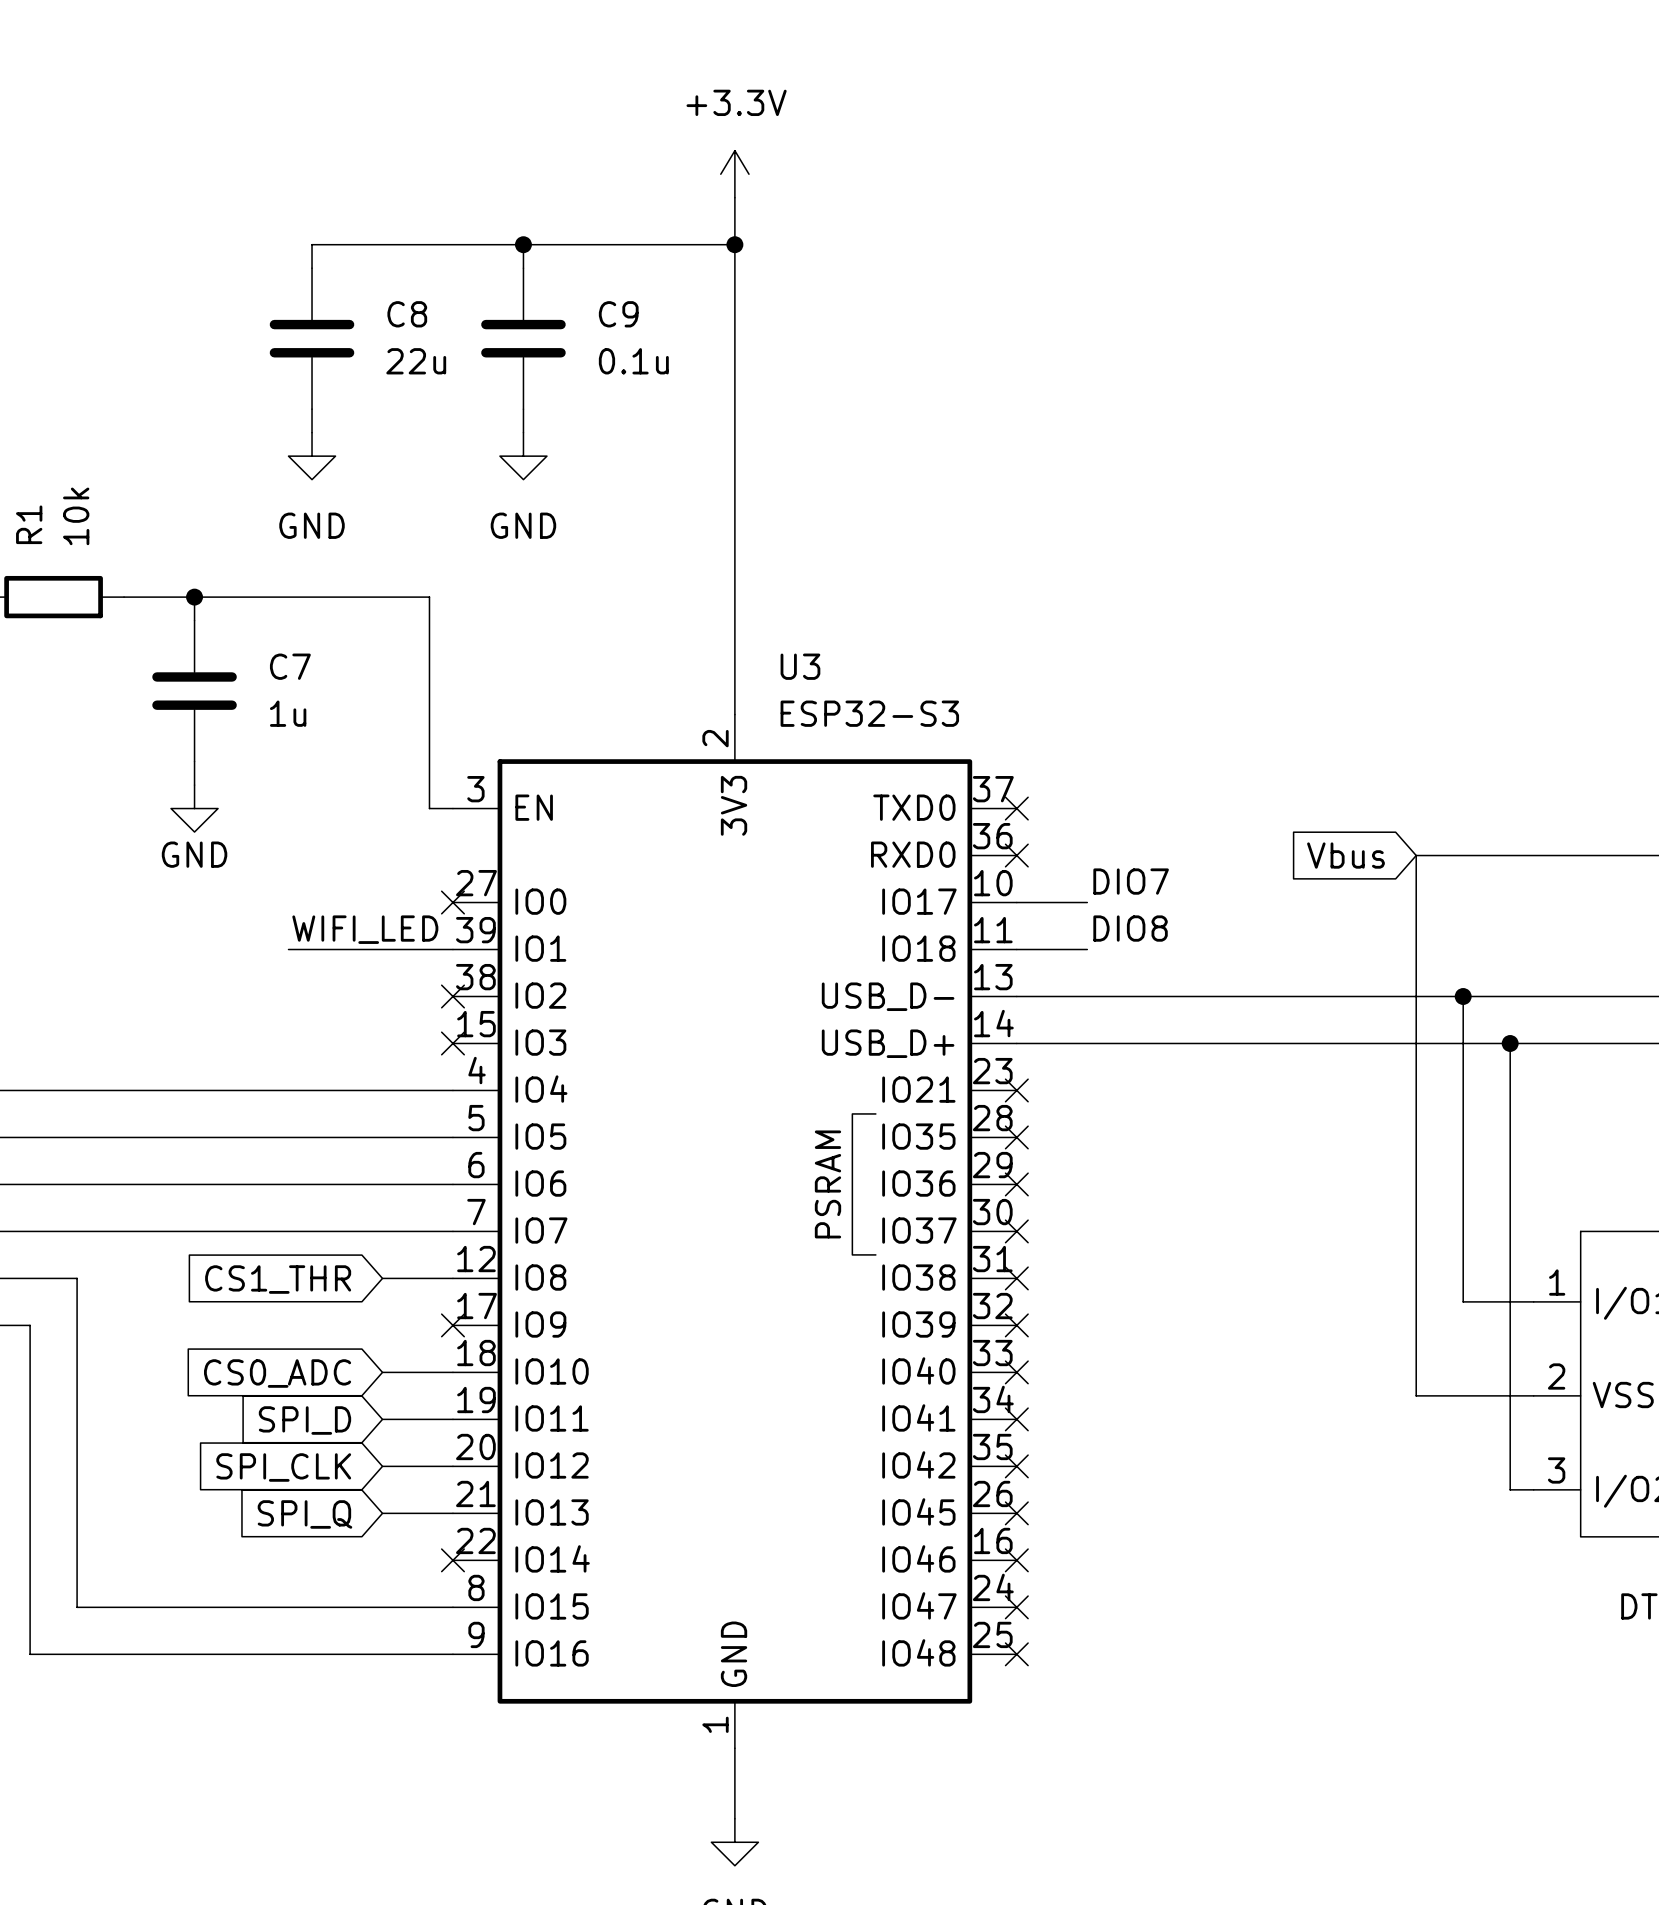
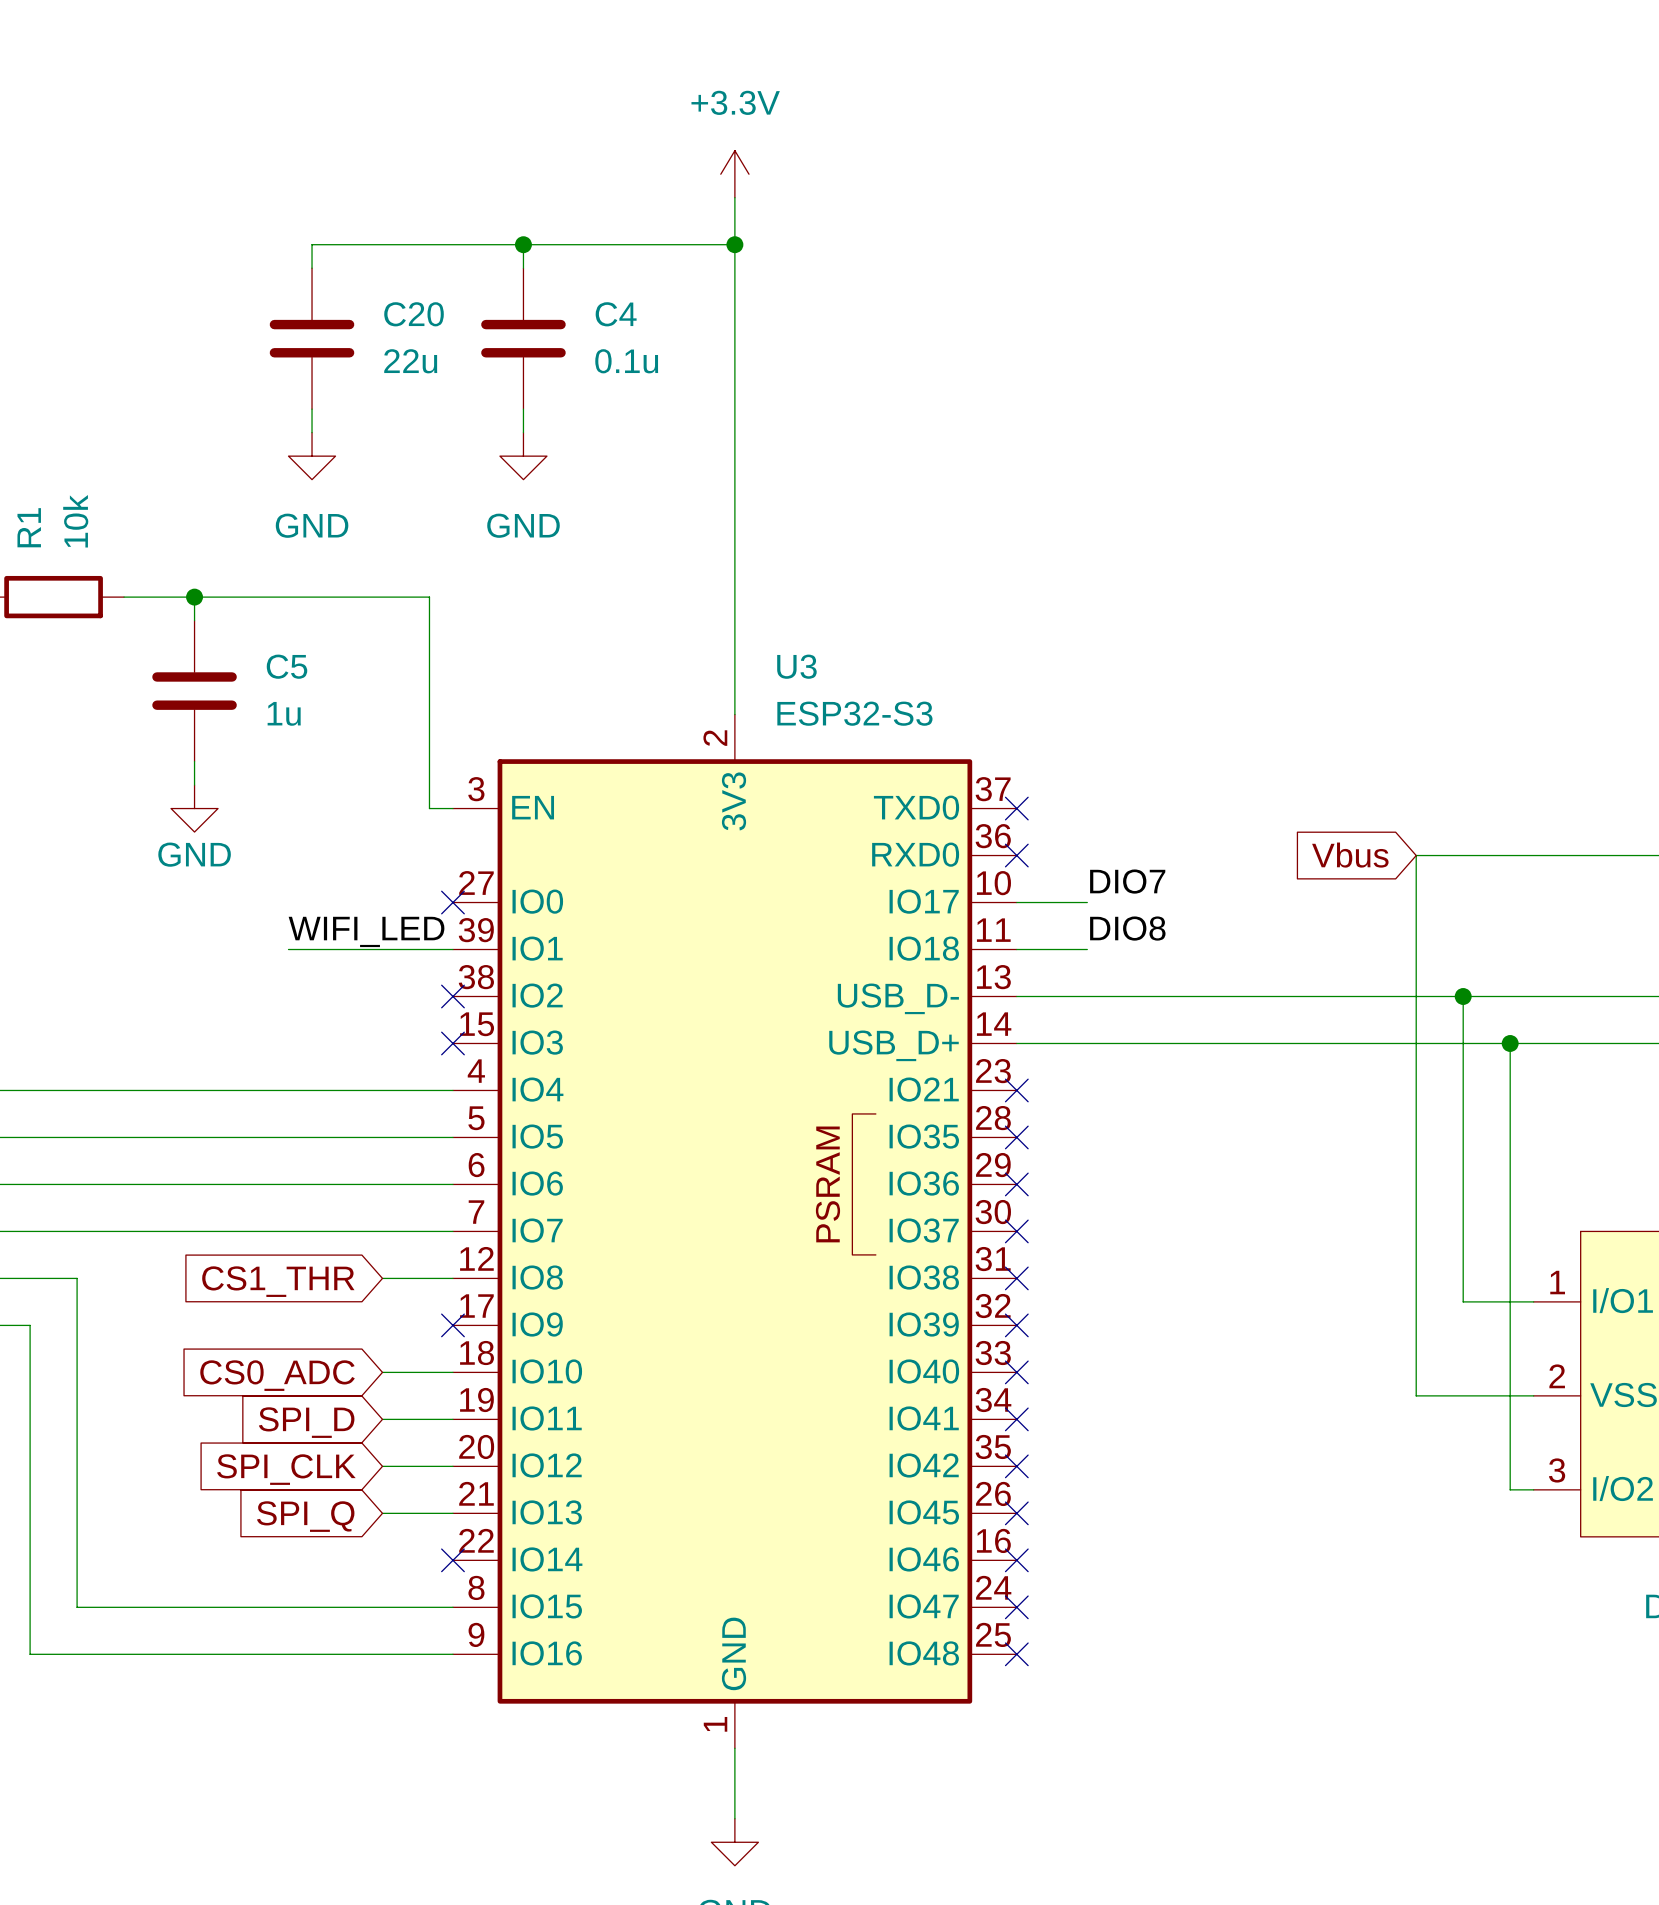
C8 name: C8 (407, 314) -> C20 (414, 314)
C9 name: C9 (618, 314) -> C4 (616, 314)
C7 name: C7 (290, 666) -> C5 (287, 666)

